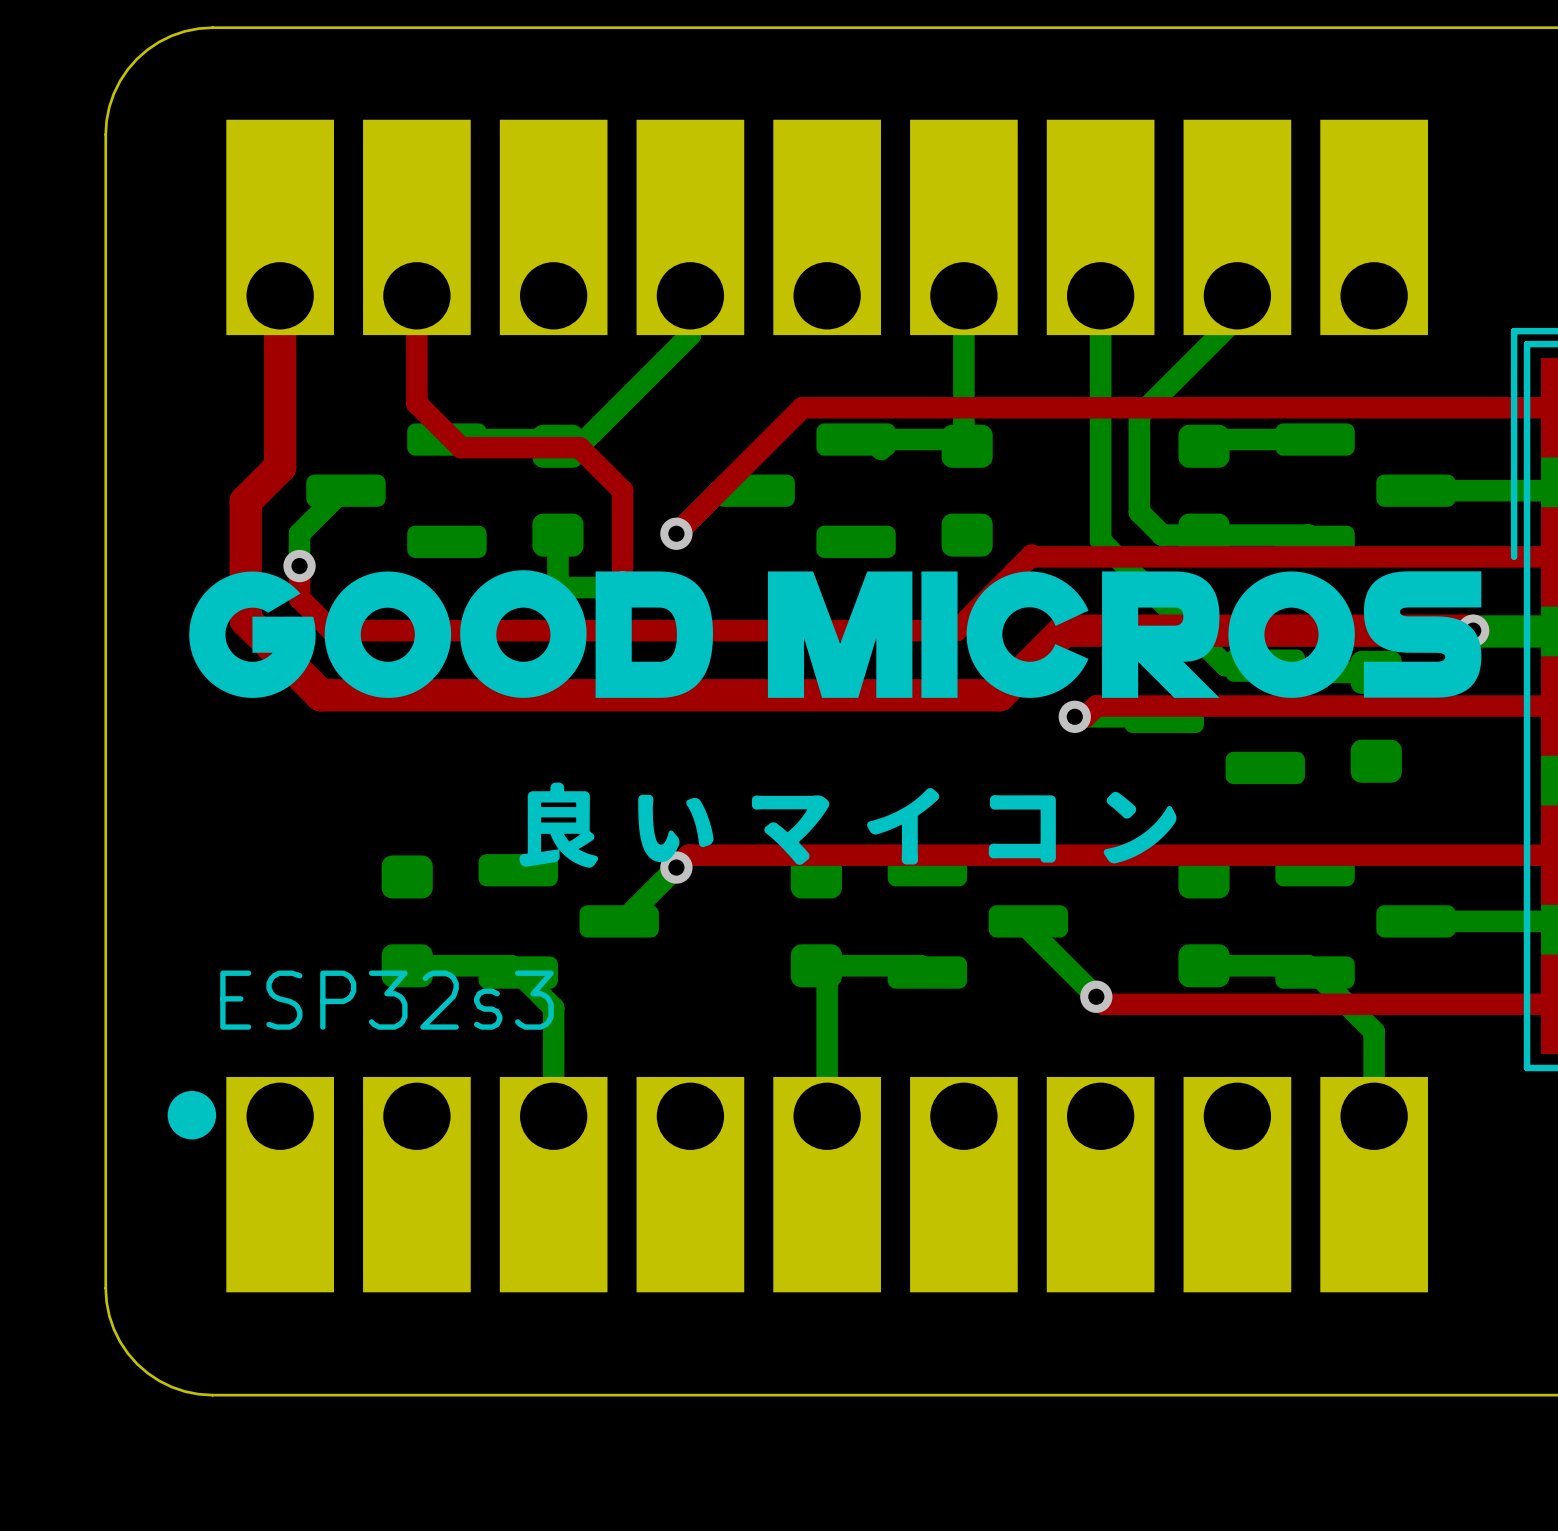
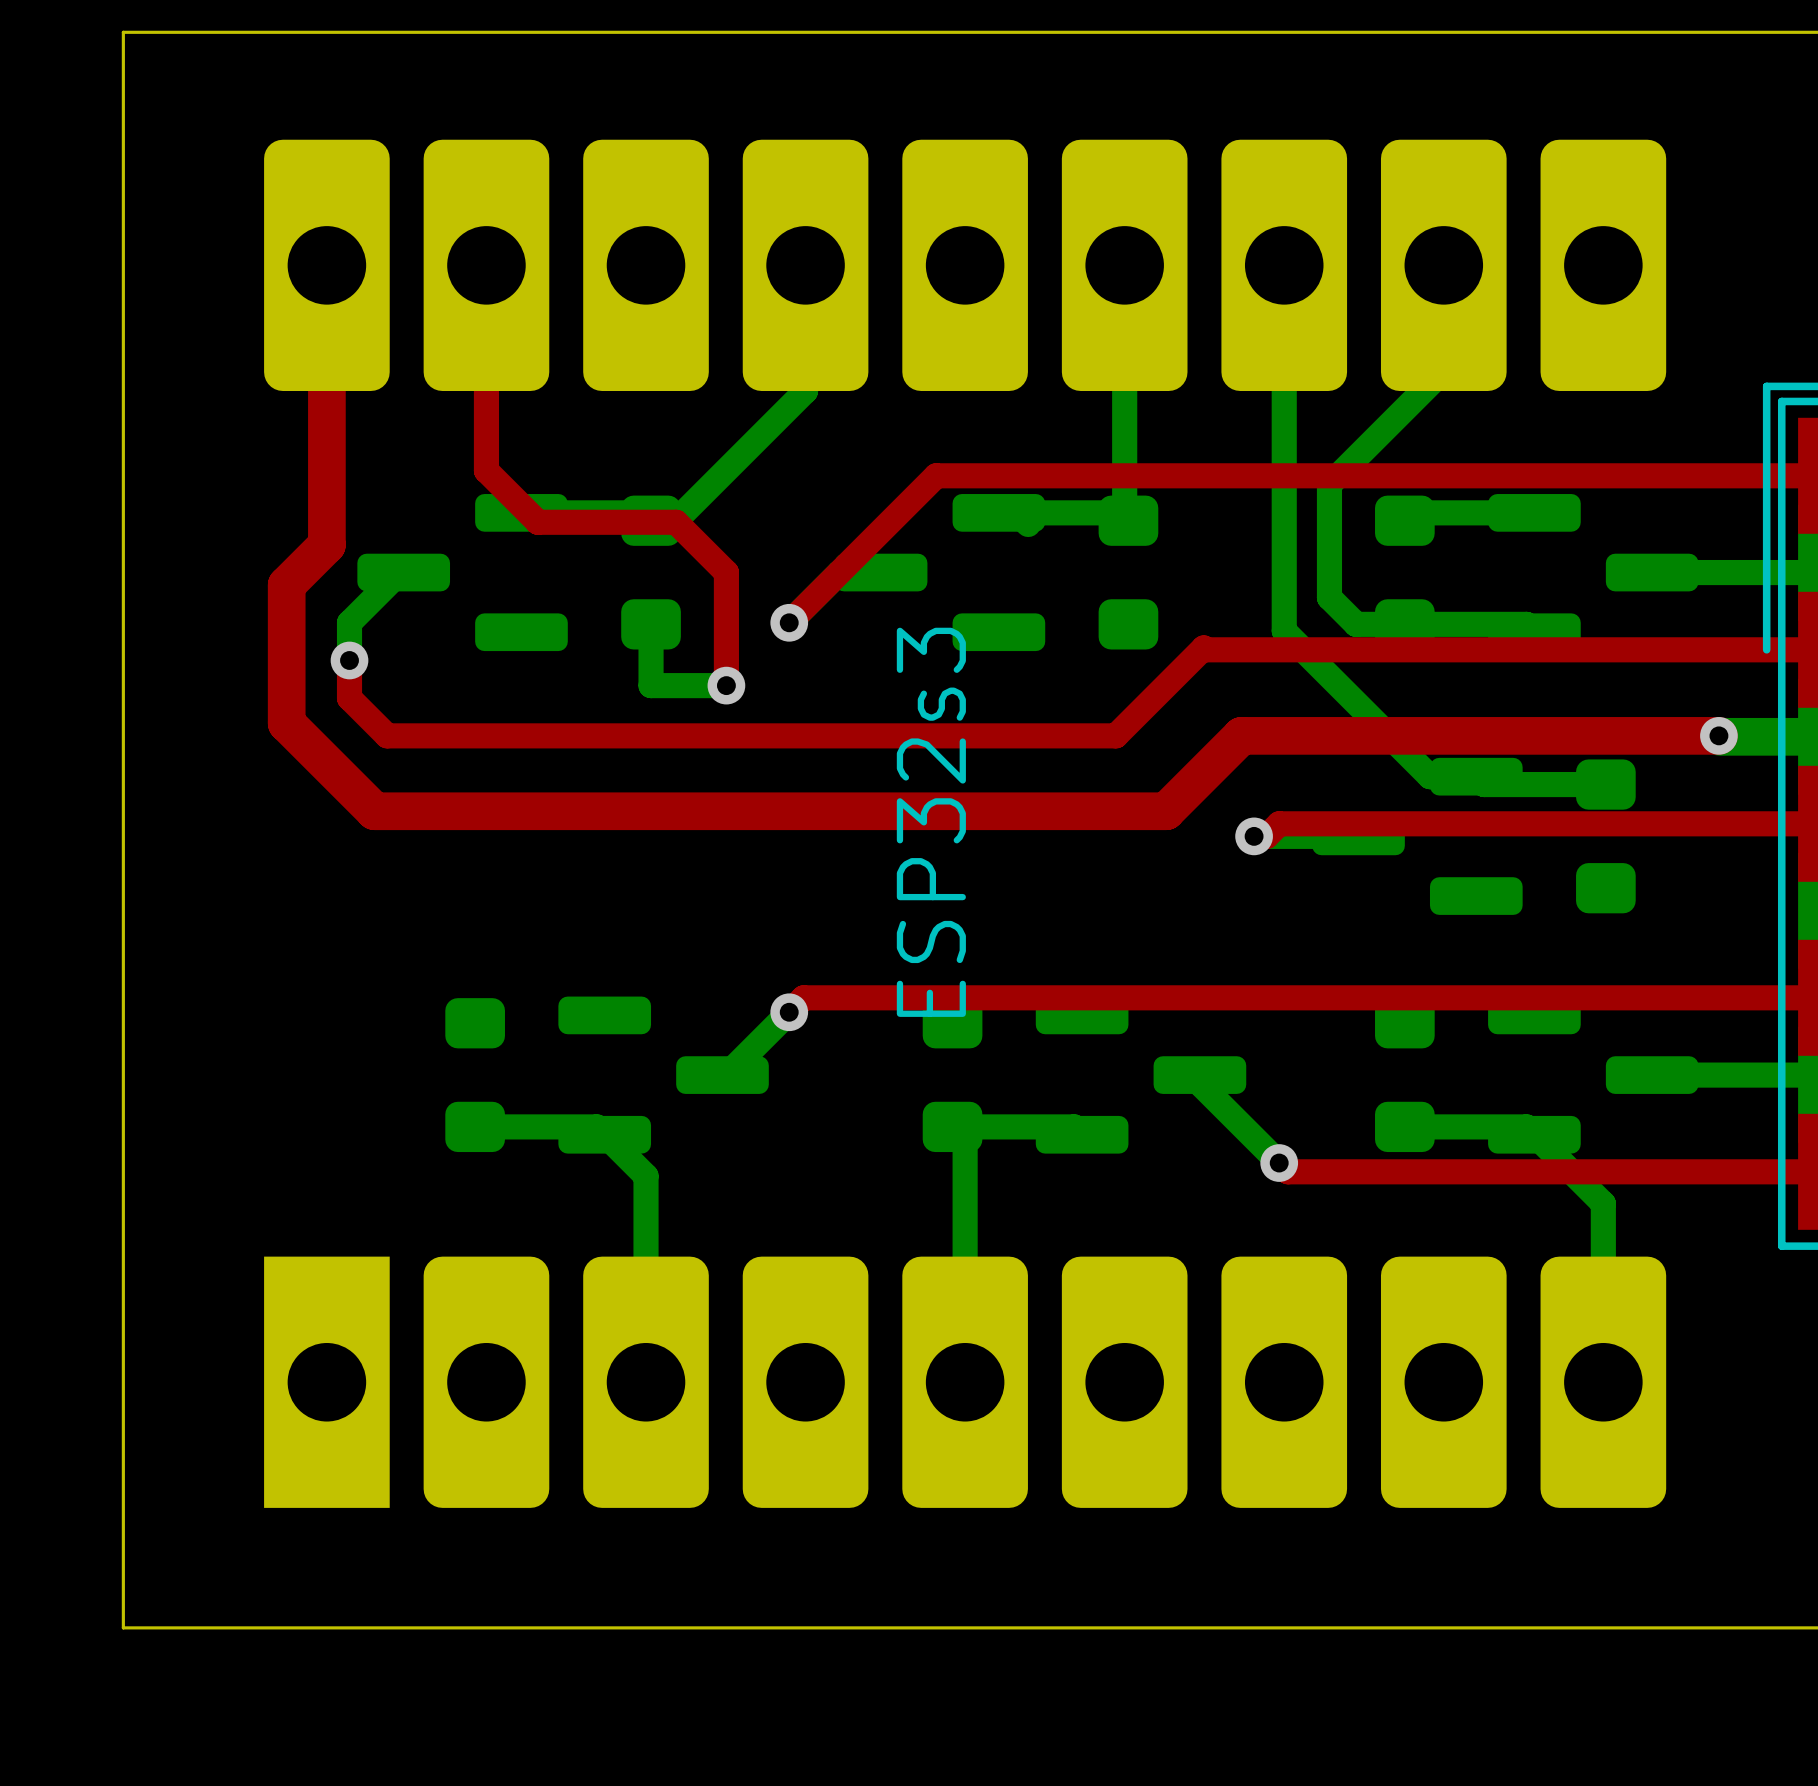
board edge: (212, 27) (184, 31) (171, 35) (159, 42) (137, 58) (127, 69) (113, 93) (106, 120) (105, 134) -> (248, 32) (123, 32) (123, 156)
ESP32s3 footprint: [167, 119, 1428, 1293] -> [264, 139, 1667, 1508]
drawing: [189, 570, 1482, 698] -> none
drawing: [519, 782, 1177, 868] -> none
ESP32s3 name position: ESP32s3 (386, 1000) -> ESP32s3 (931, 822)
board edge: (105, 1288) (106, 1302) (113, 1329) (127, 1353) (137, 1363) (159, 1380) (171, 1387) (184, 1391) (212, 1395) -> (123, 1503) (123, 1627) (248, 1627)

